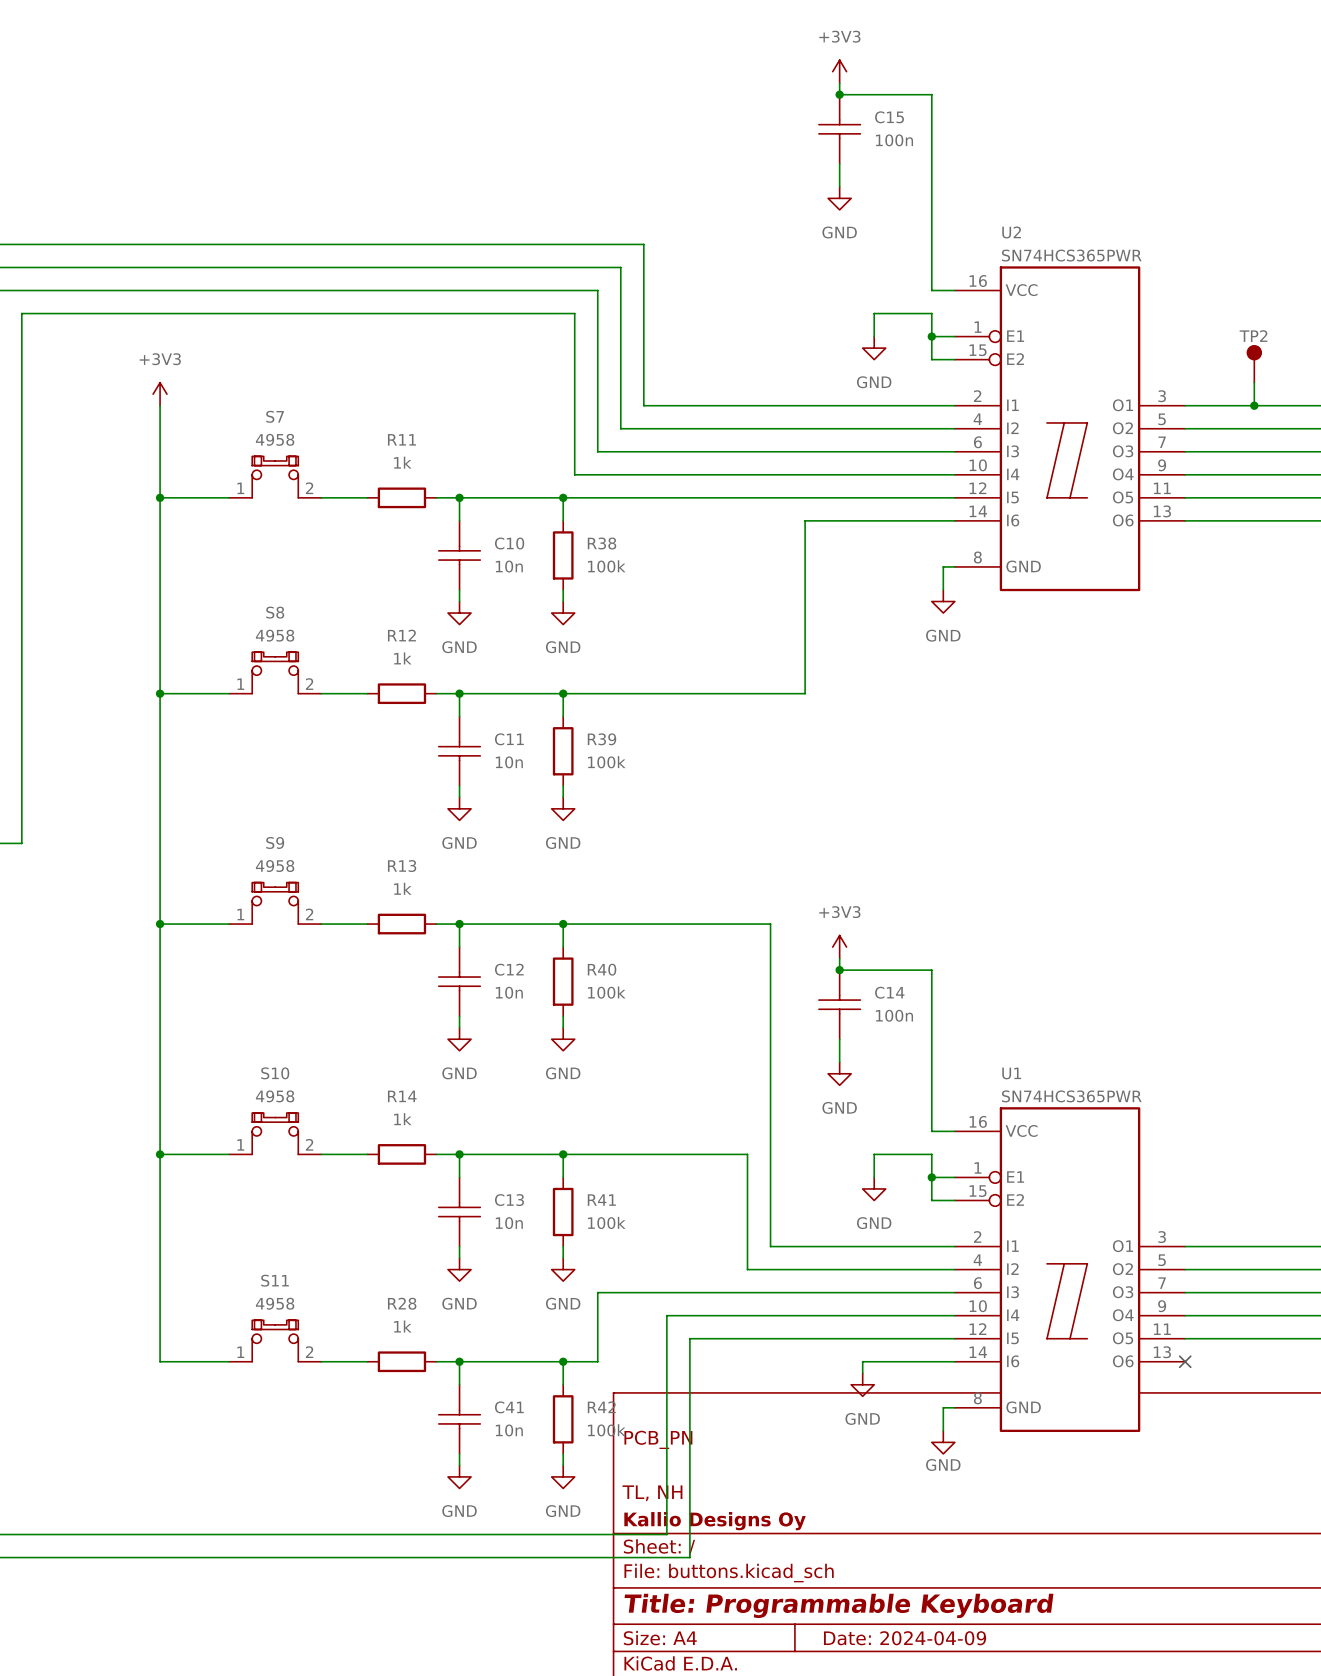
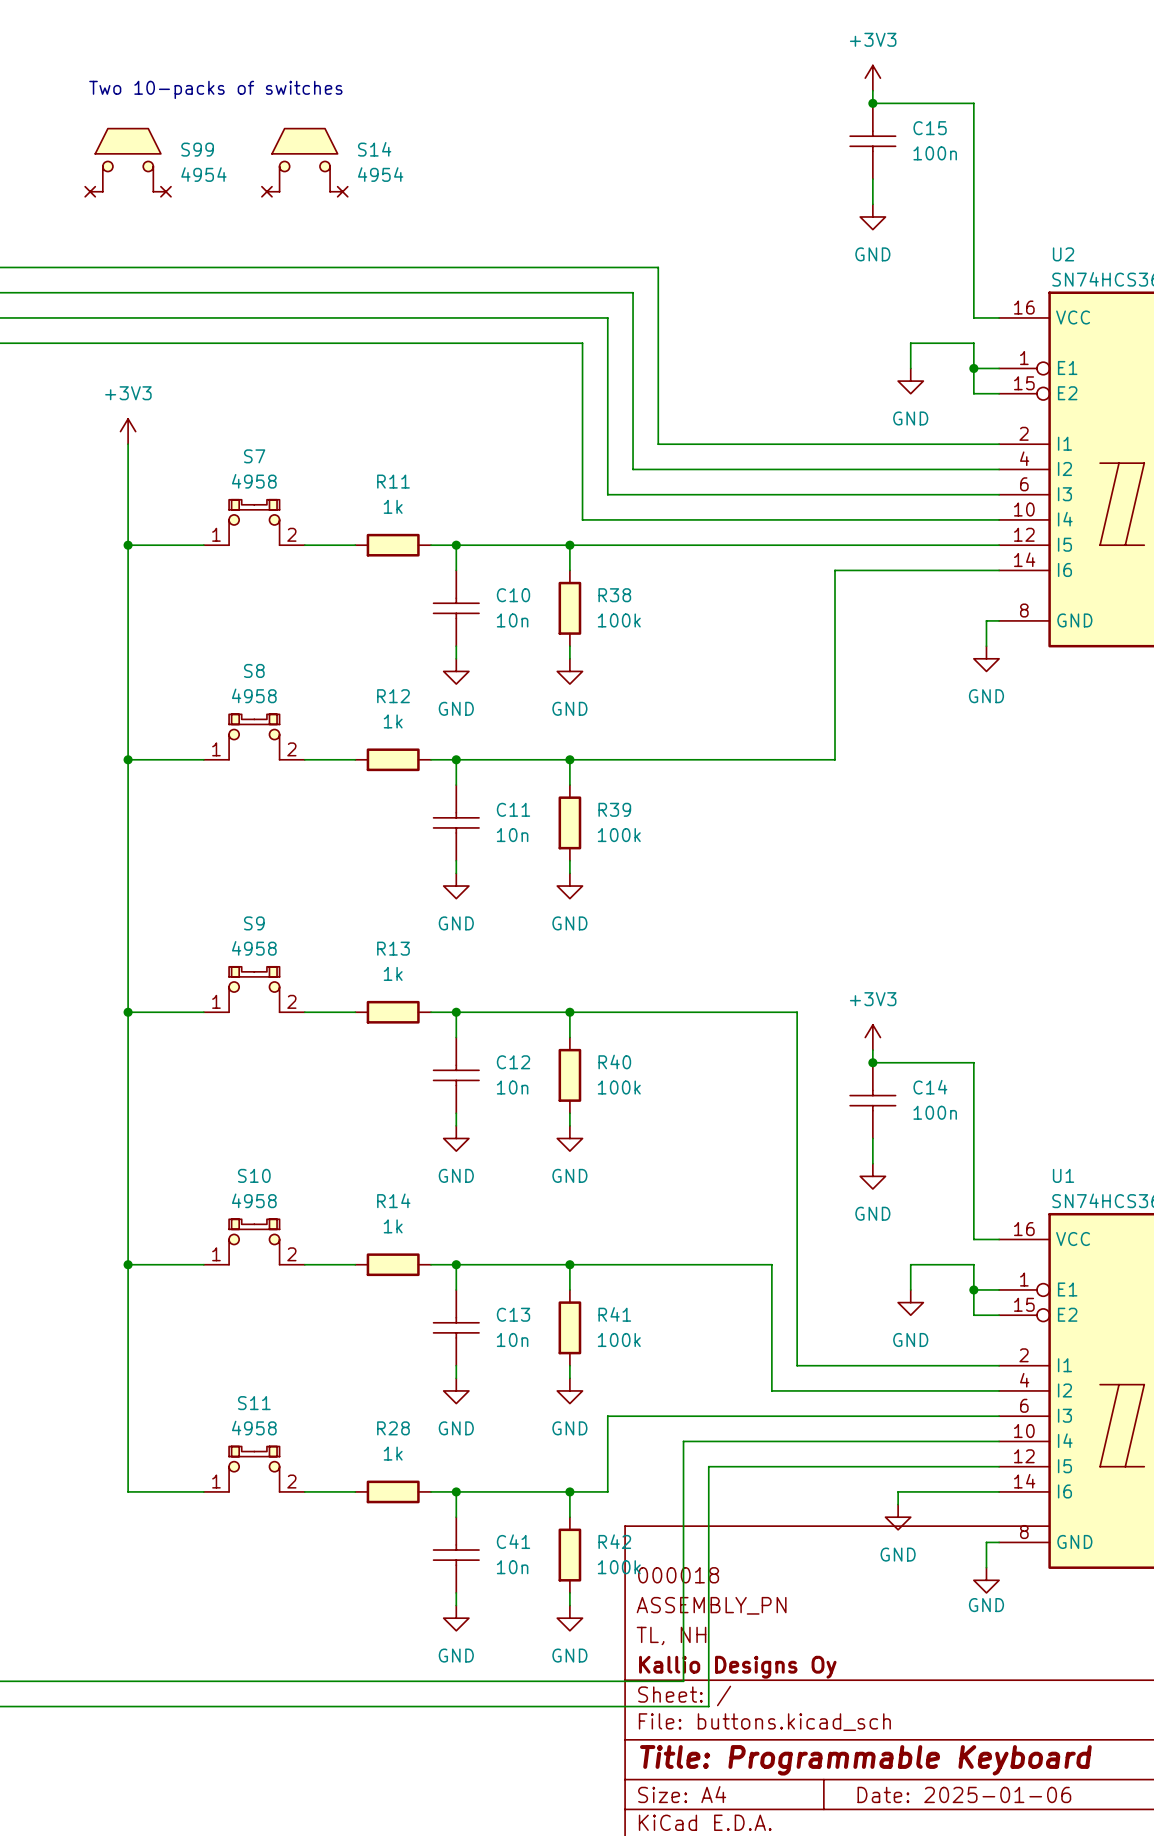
text: none -> Two 10-packs of switches (215, 89)
S99: none -> 4954 (128, 162)
S14: none -> 4954 (304, 162)
title block: PCB_PN (658, 1439) -> 000018 (678, 1575)
title block: none -> ASSEMBLY_PN (711, 1605)
title block: Date: 2024-04-09 (905, 1638) -> Date: 2025-01-06 (964, 1794)

